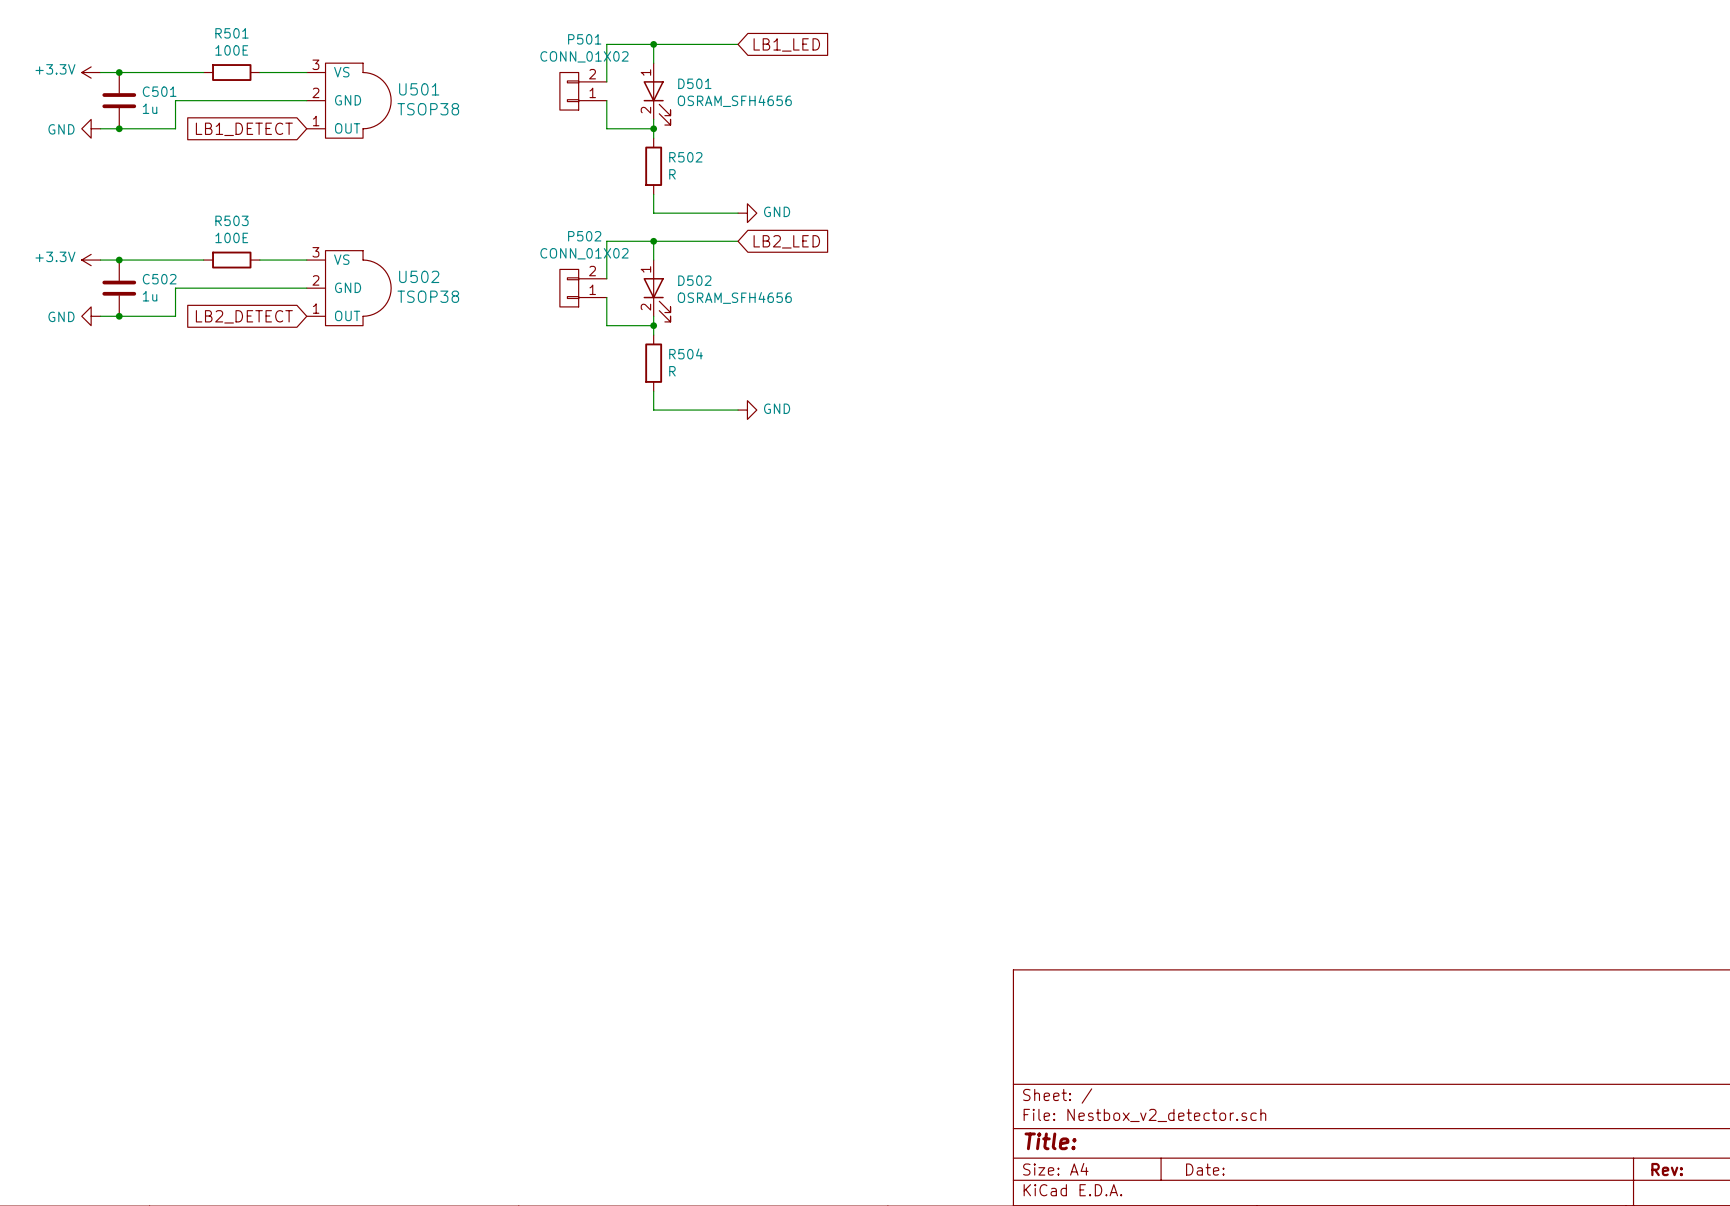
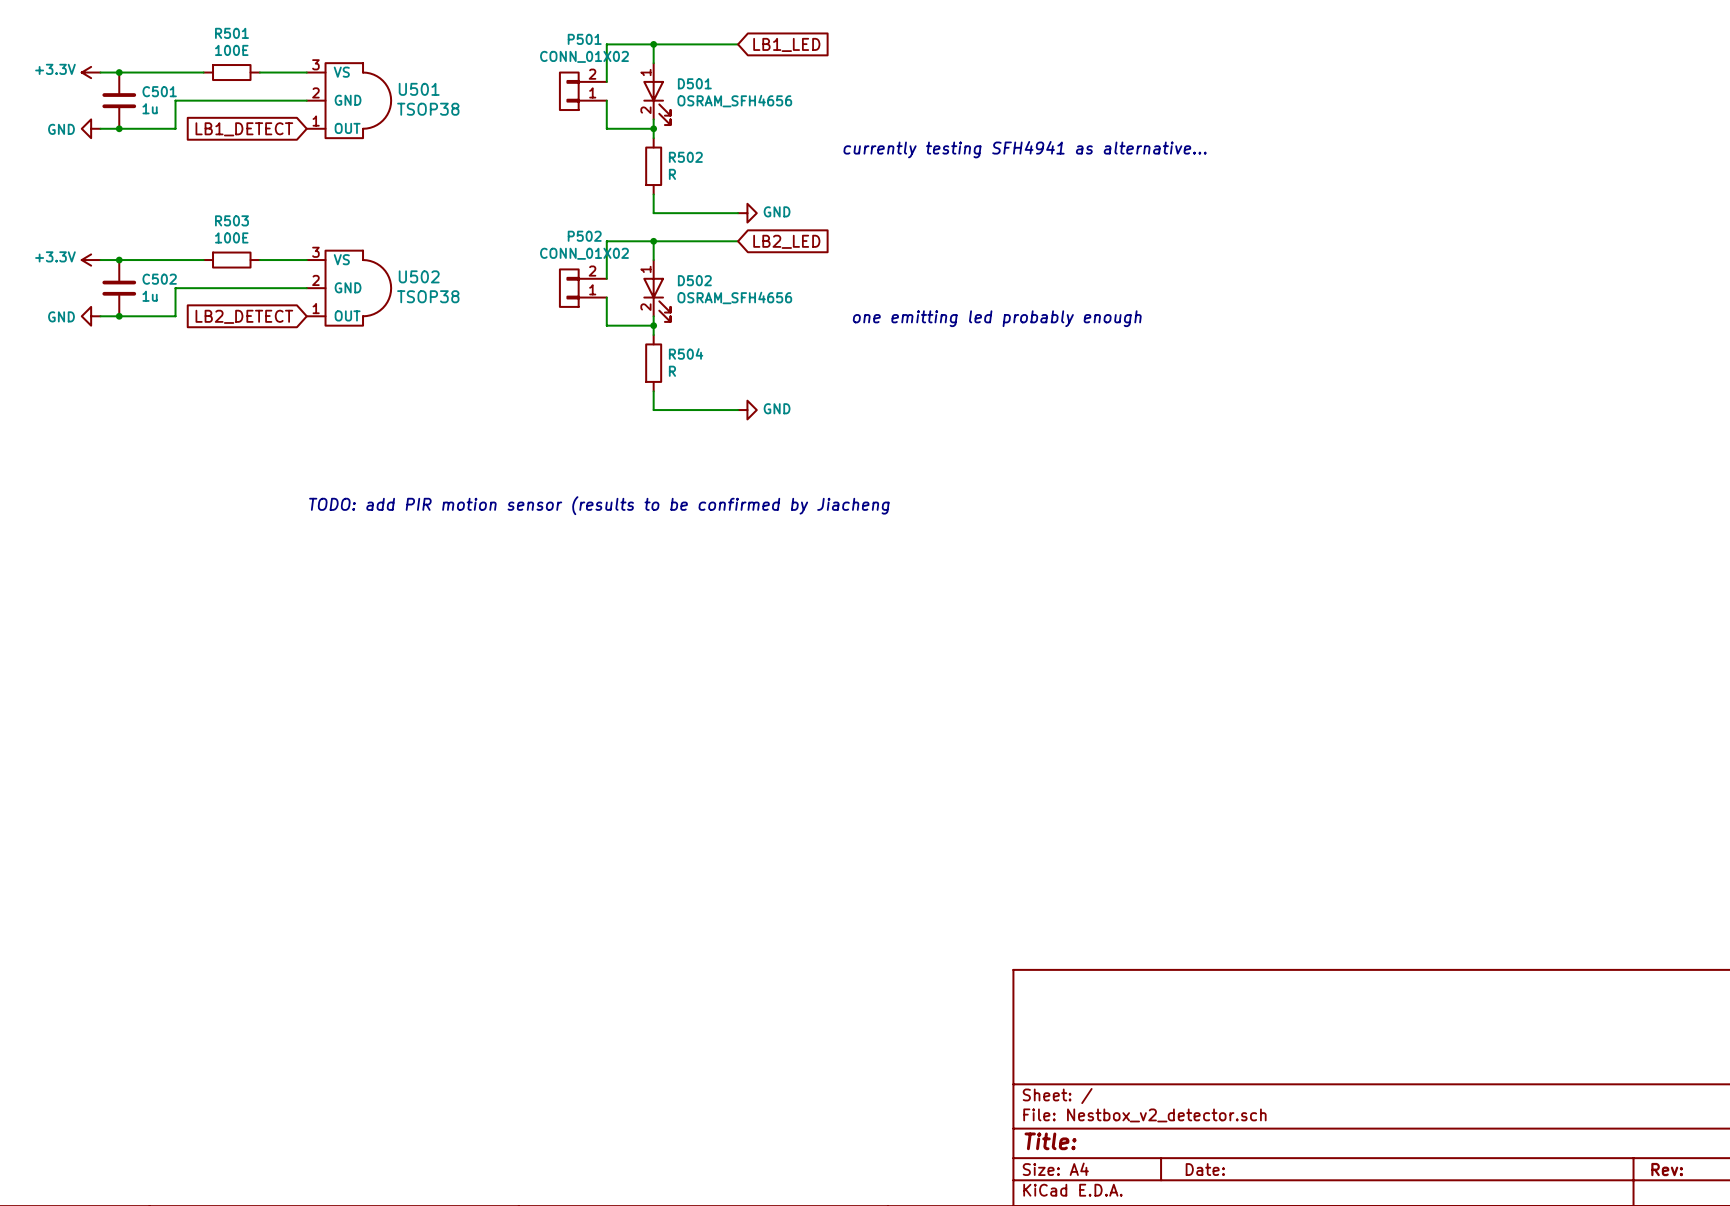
text: none -> currently testing SFH4941 as alternative… (1025, 149)
text: none -> one emitting led probably enough (997, 318)
text: none -> TODO: add PIR motion sensor (results to be confirmed by Jiacheng (599, 505)

